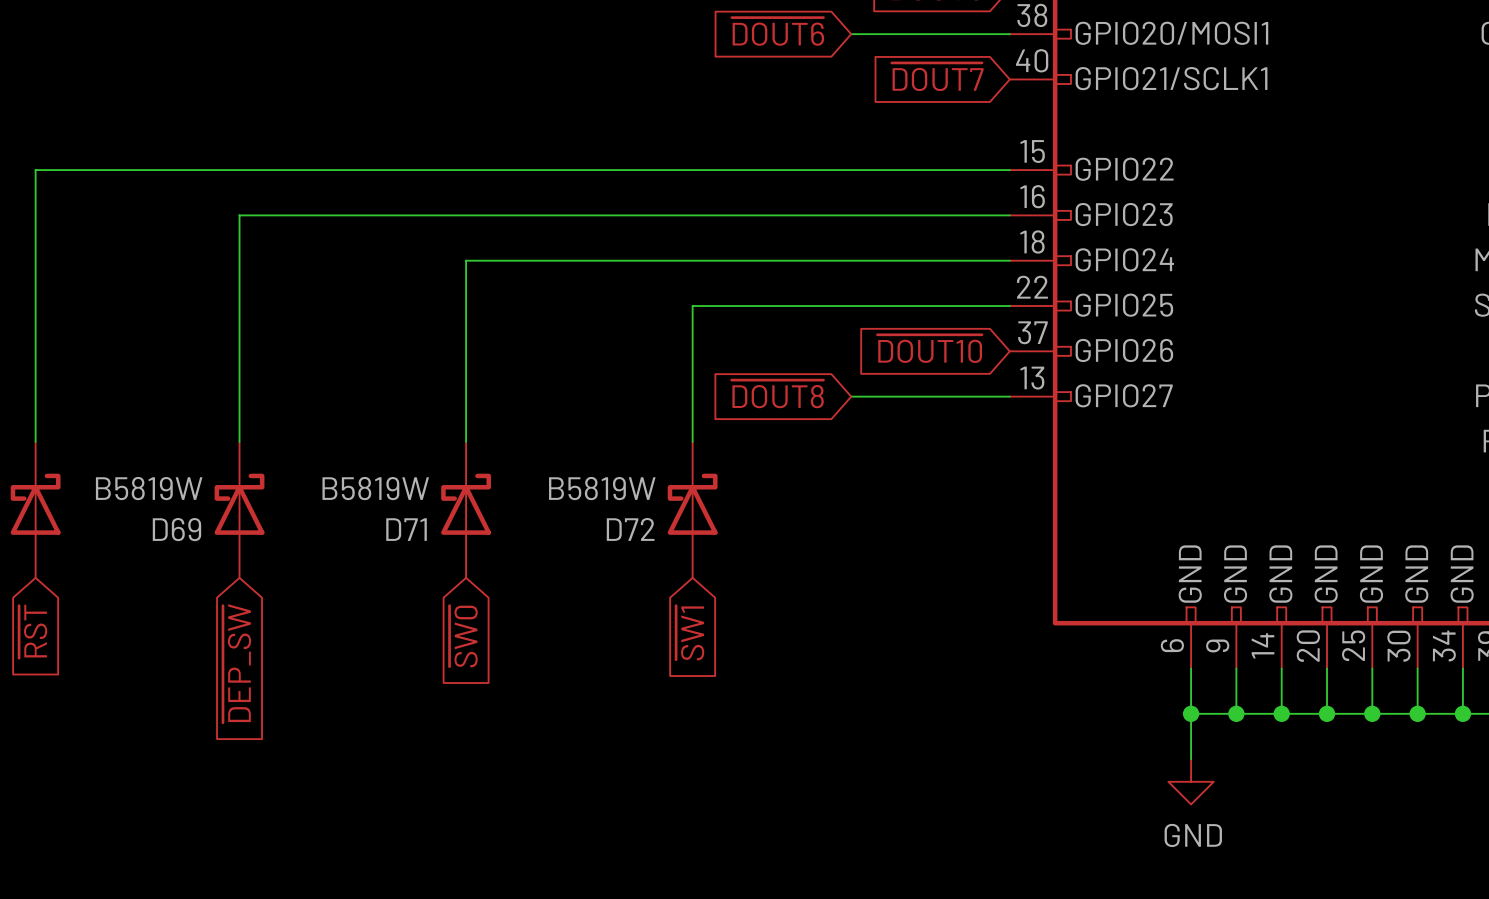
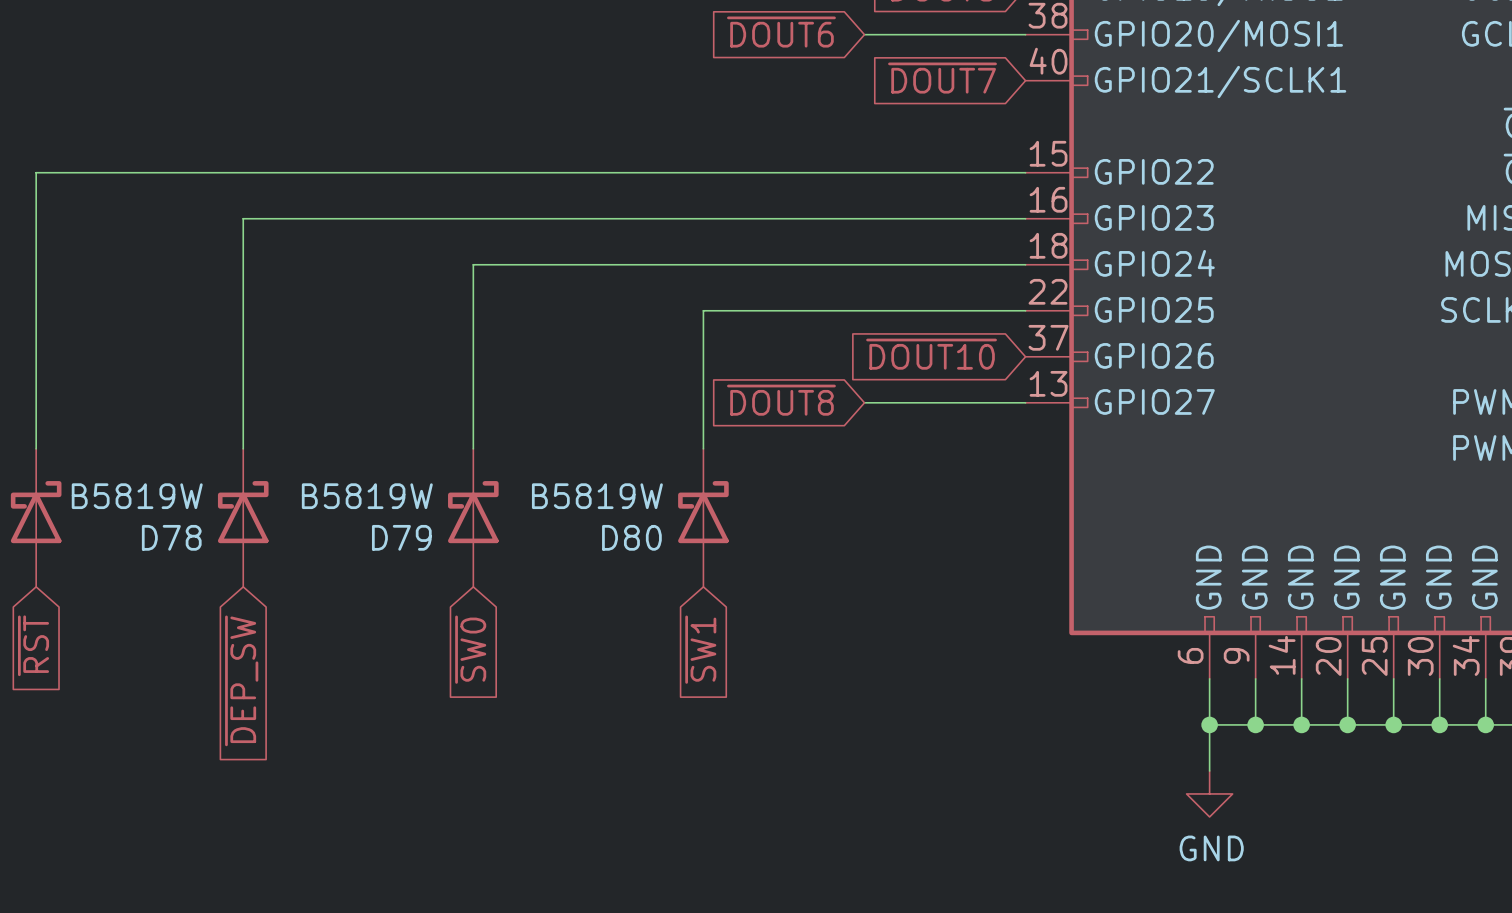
D69 name: D69 (176, 529) -> D78 (171, 537)
D71 name: D71 (406, 529) -> D79 (401, 537)
D72 name: D72 (630, 529) -> D80 (631, 537)

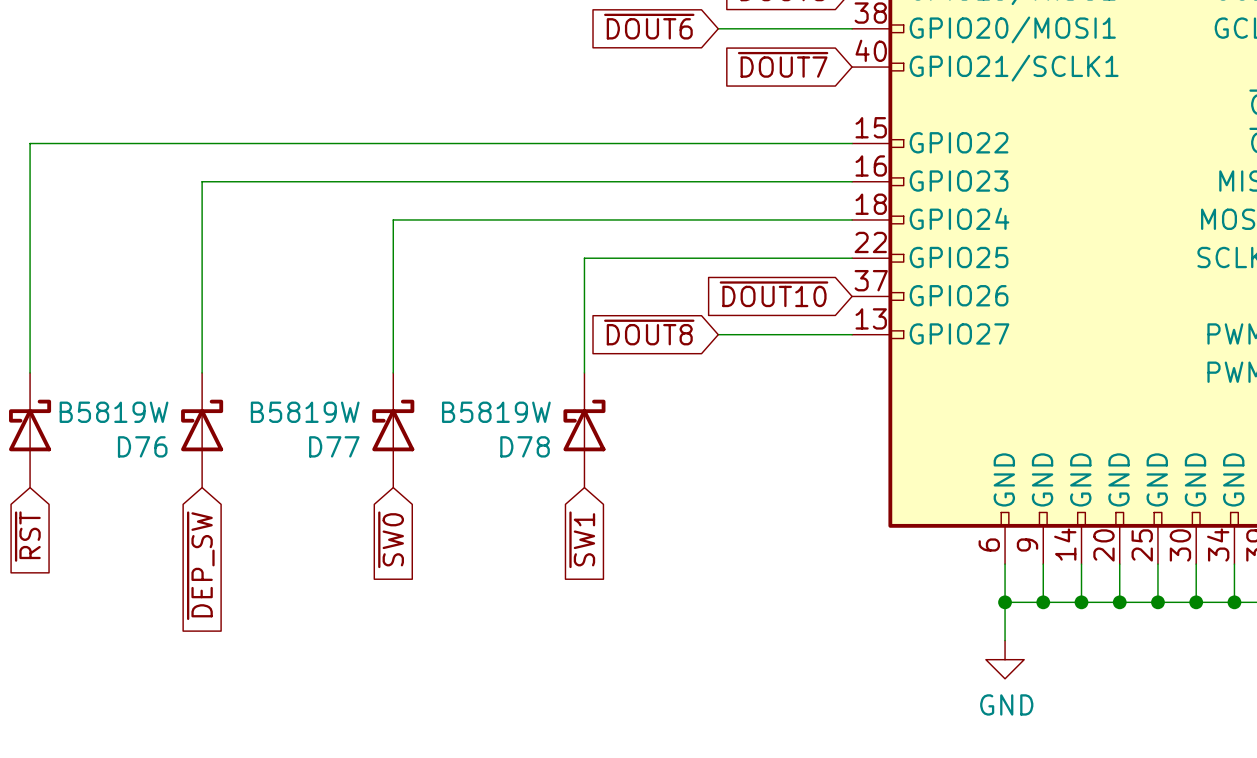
D78 name: D78 (171, 537) -> D76 (142, 446)
D79 name: D79 (401, 537) -> D77 (334, 446)
D80 name: D80 (631, 537) -> D78 (525, 446)

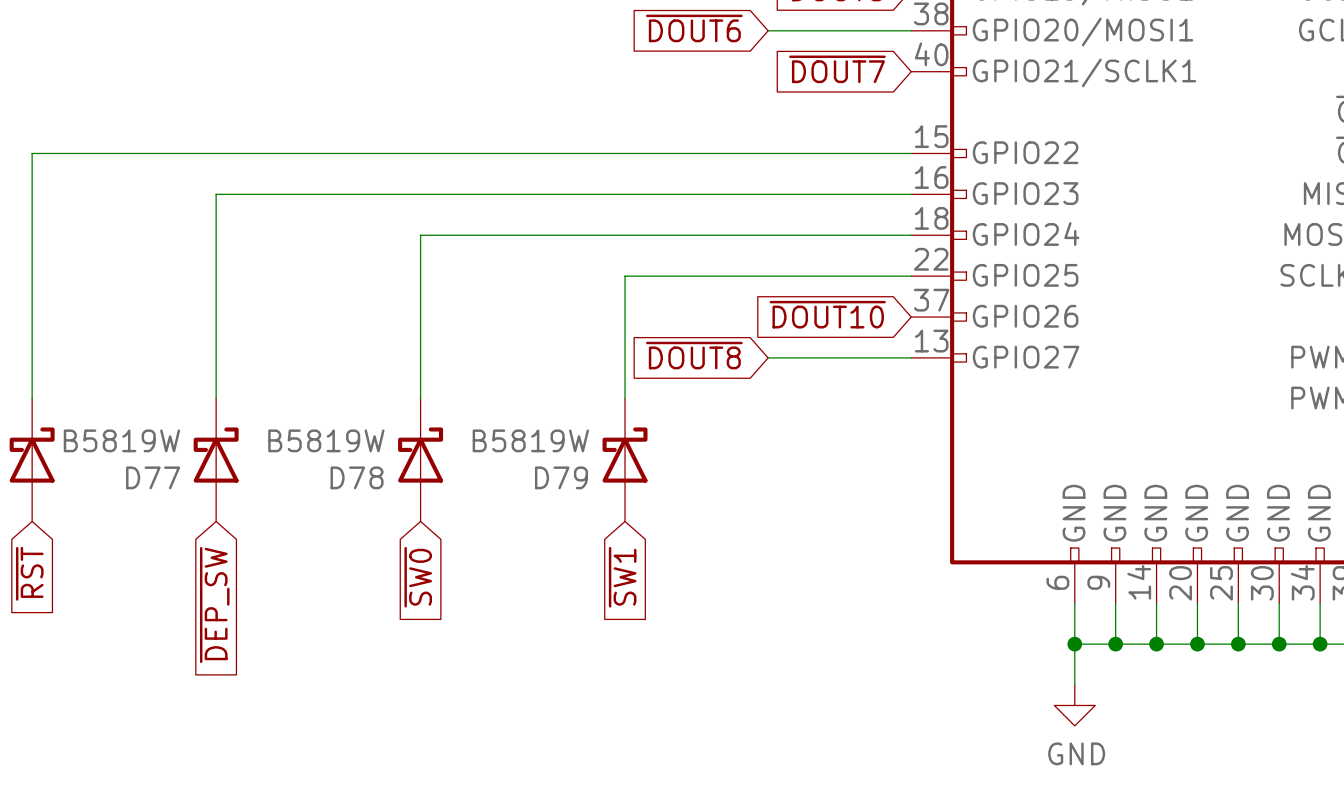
D76 name: D76 (142, 446) -> D77 (153, 477)
D77 name: D77 (334, 446) -> D78 (357, 477)
D78 name: D78 (525, 446) -> D79 (561, 477)

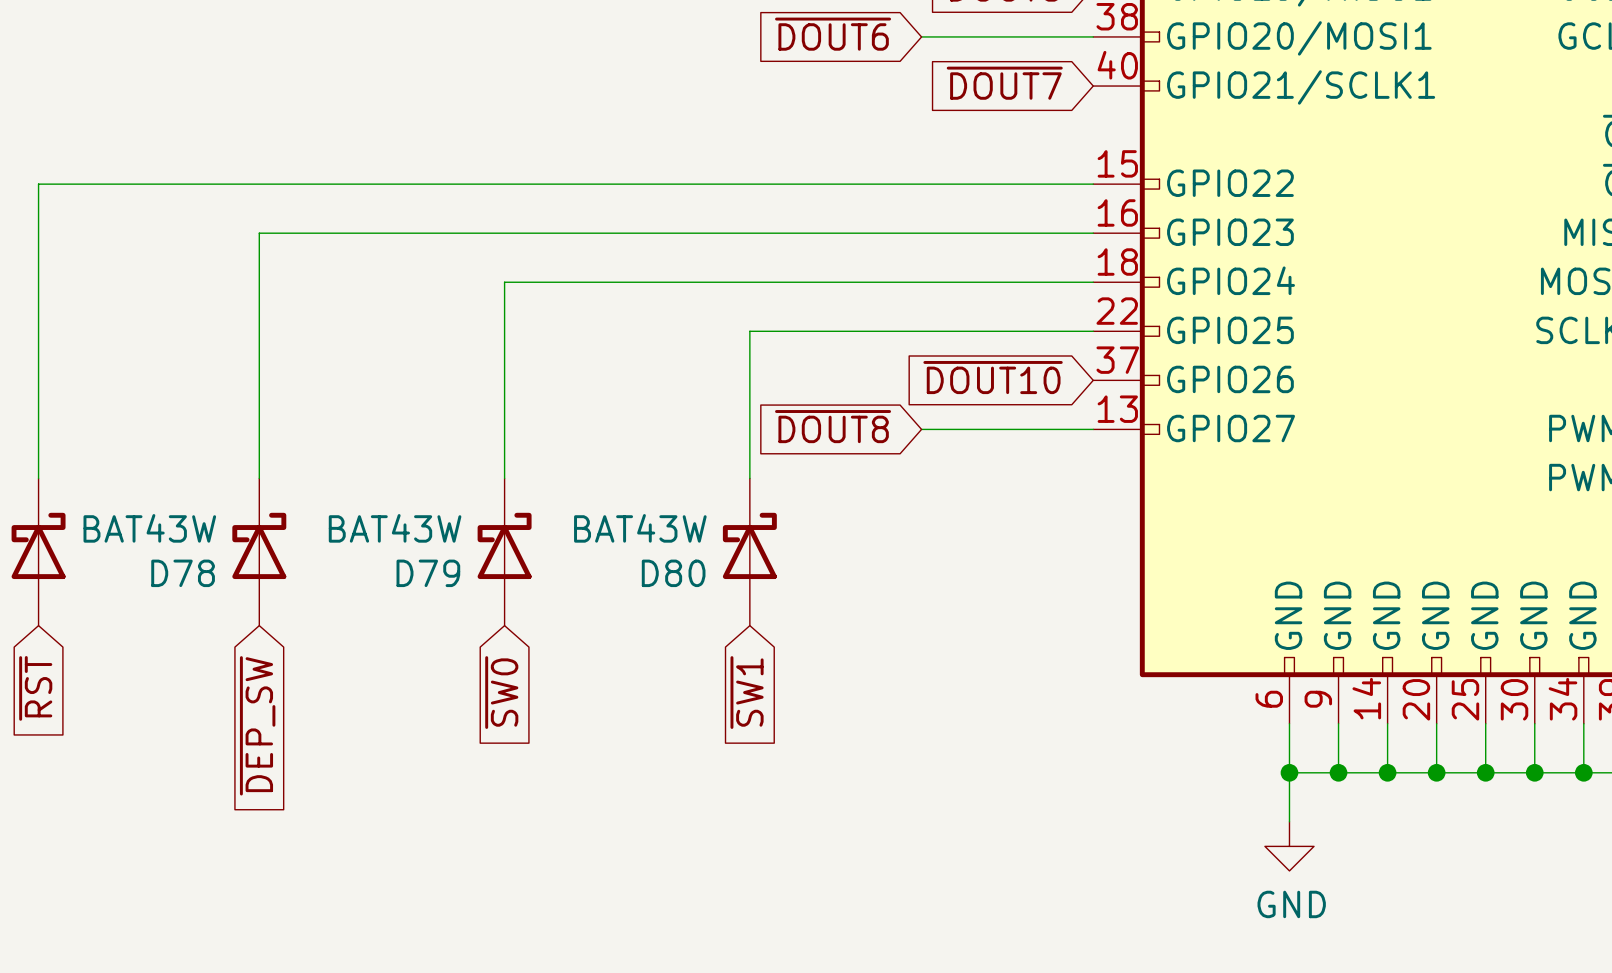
D77 value: B5819W (121, 440) -> BAT43W (149, 528)
D78 value: B5819W (326, 440) -> BAT43W (395, 528)
D79 value: B5819W (530, 440) -> BAT43W (640, 528)
D77 name: D77 (153, 477) -> D78 (183, 573)
D78 name: D78 (357, 477) -> D79 (428, 573)
D79 name: D79 (561, 477) -> D80 (673, 573)

